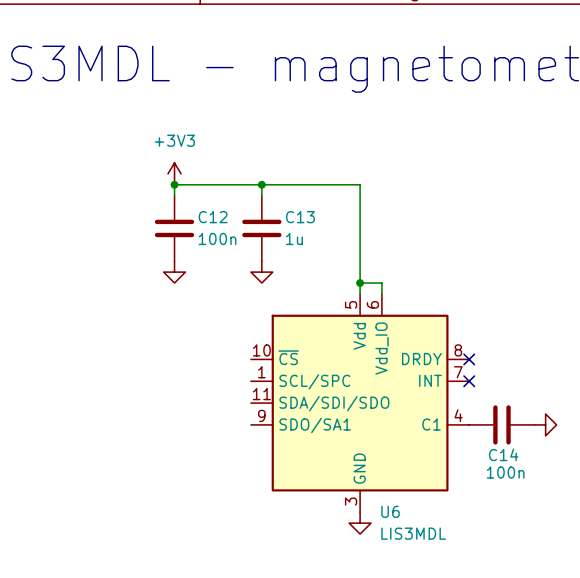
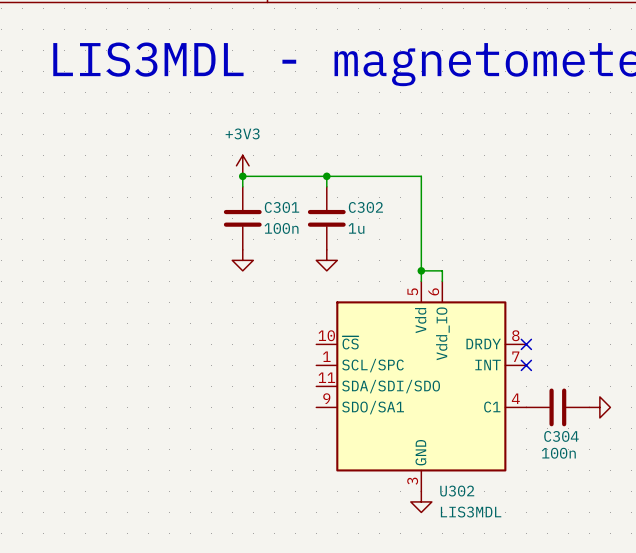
C12 name: C12 (213, 217) -> C301 (282, 207)
C13 name: C13 (300, 217) -> C302 (365, 207)
C14 name: C14 (503, 454) -> C304 (561, 436)
U6 name: U6 (390, 511) -> U302 (457, 491)

